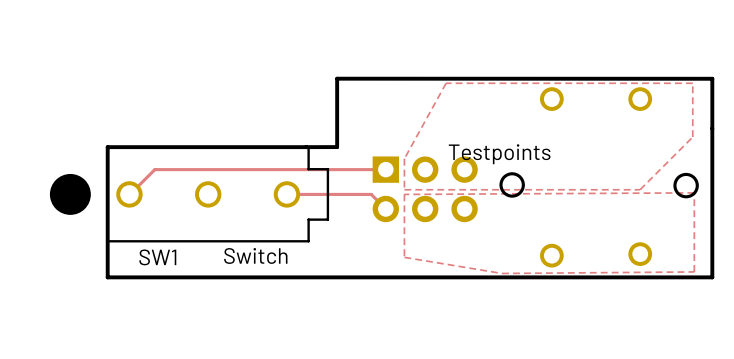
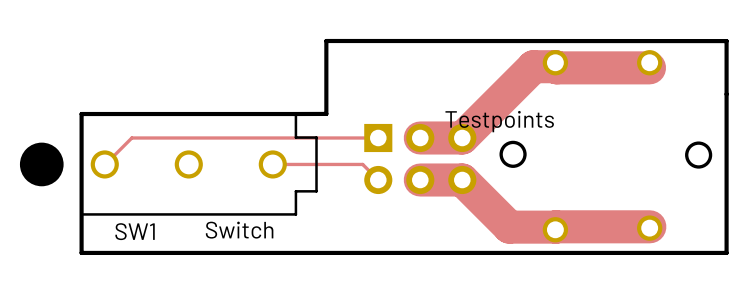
top zone outline: (692, 83) (446, 83) (404, 158) (404, 189) (640, 189) (692, 137) (692, 83) -> none
top track: none -> (649, 67) (533, 66) (462, 137) (420, 137)
top zone outline: (694, 192) (404, 194) (404, 257) (502, 273) (694, 271) (694, 192) -> none
top track: none -> (420, 180) (462, 180) (509, 227) (649, 226)

